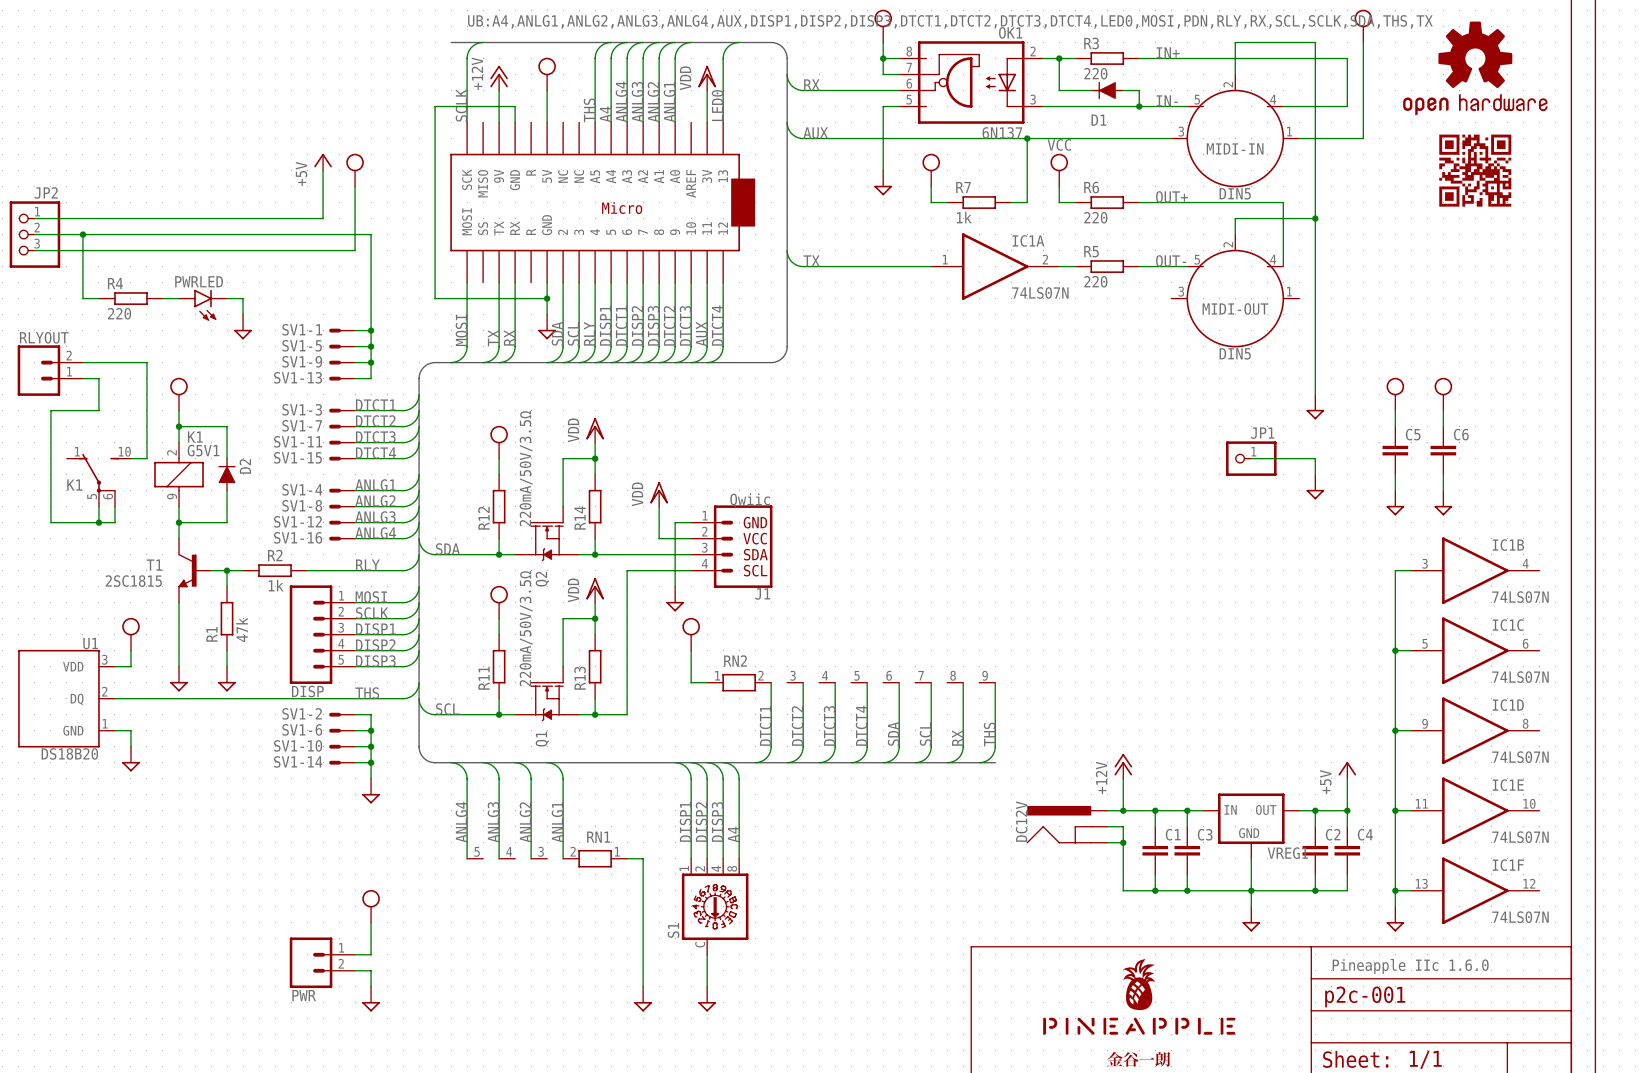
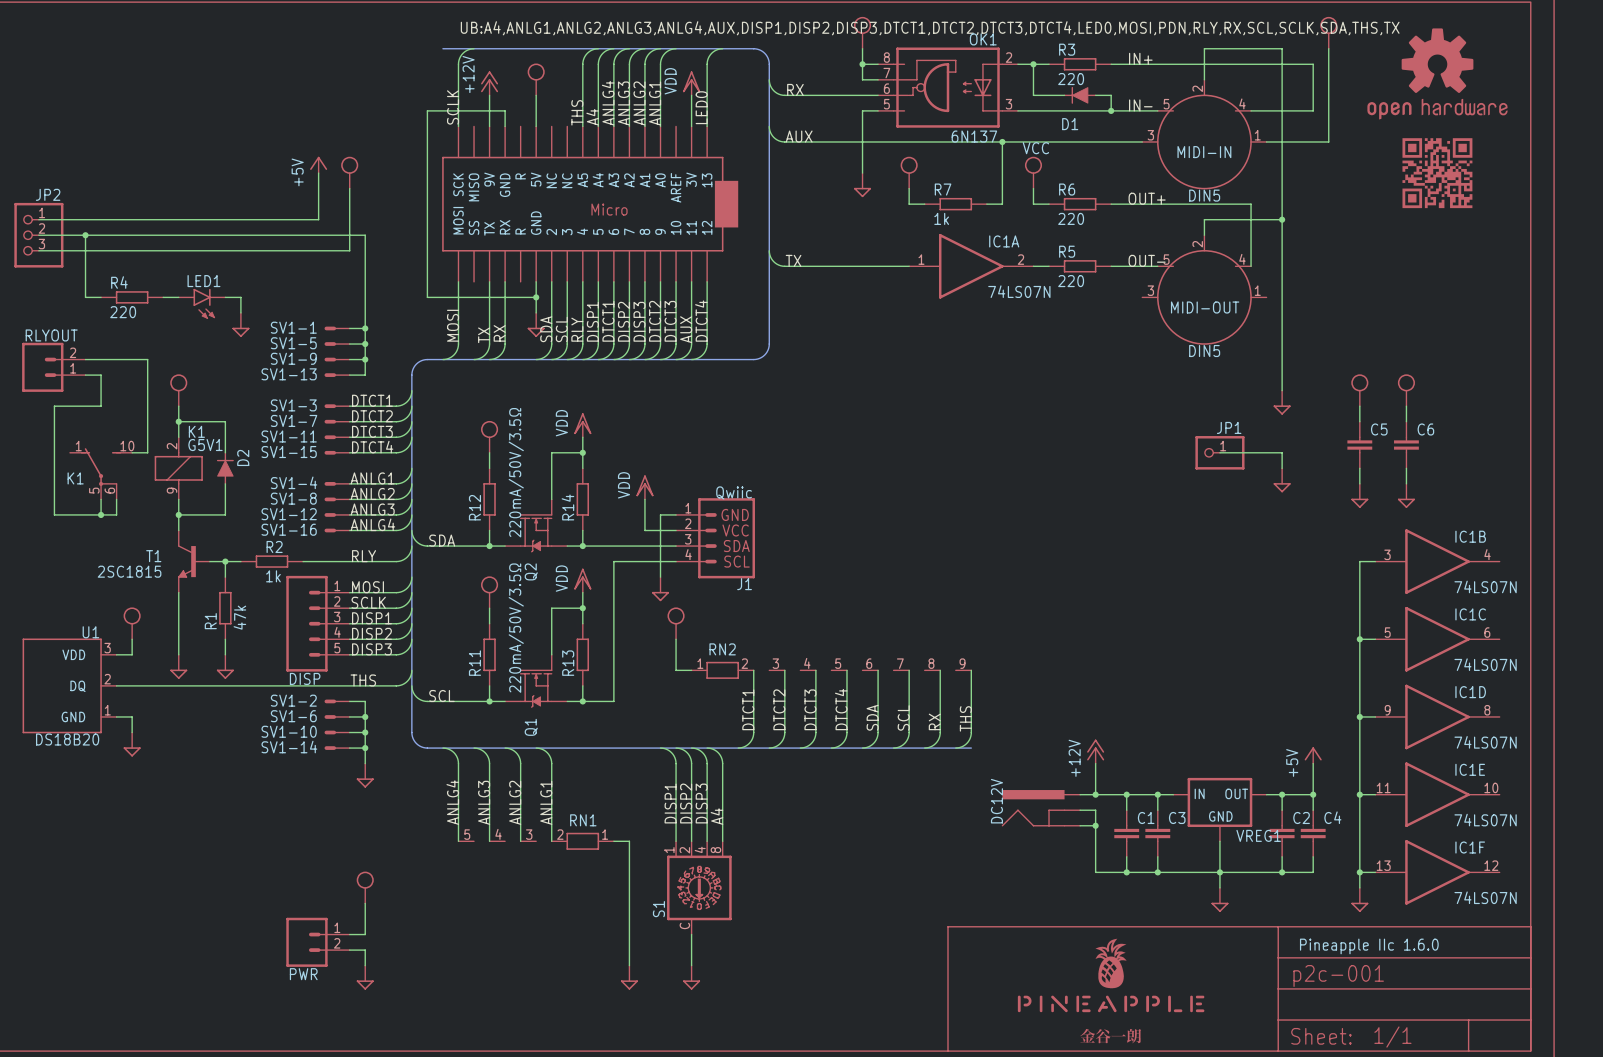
PWRLED name: PWRLED (199, 281) -> LED1 (203, 281)

